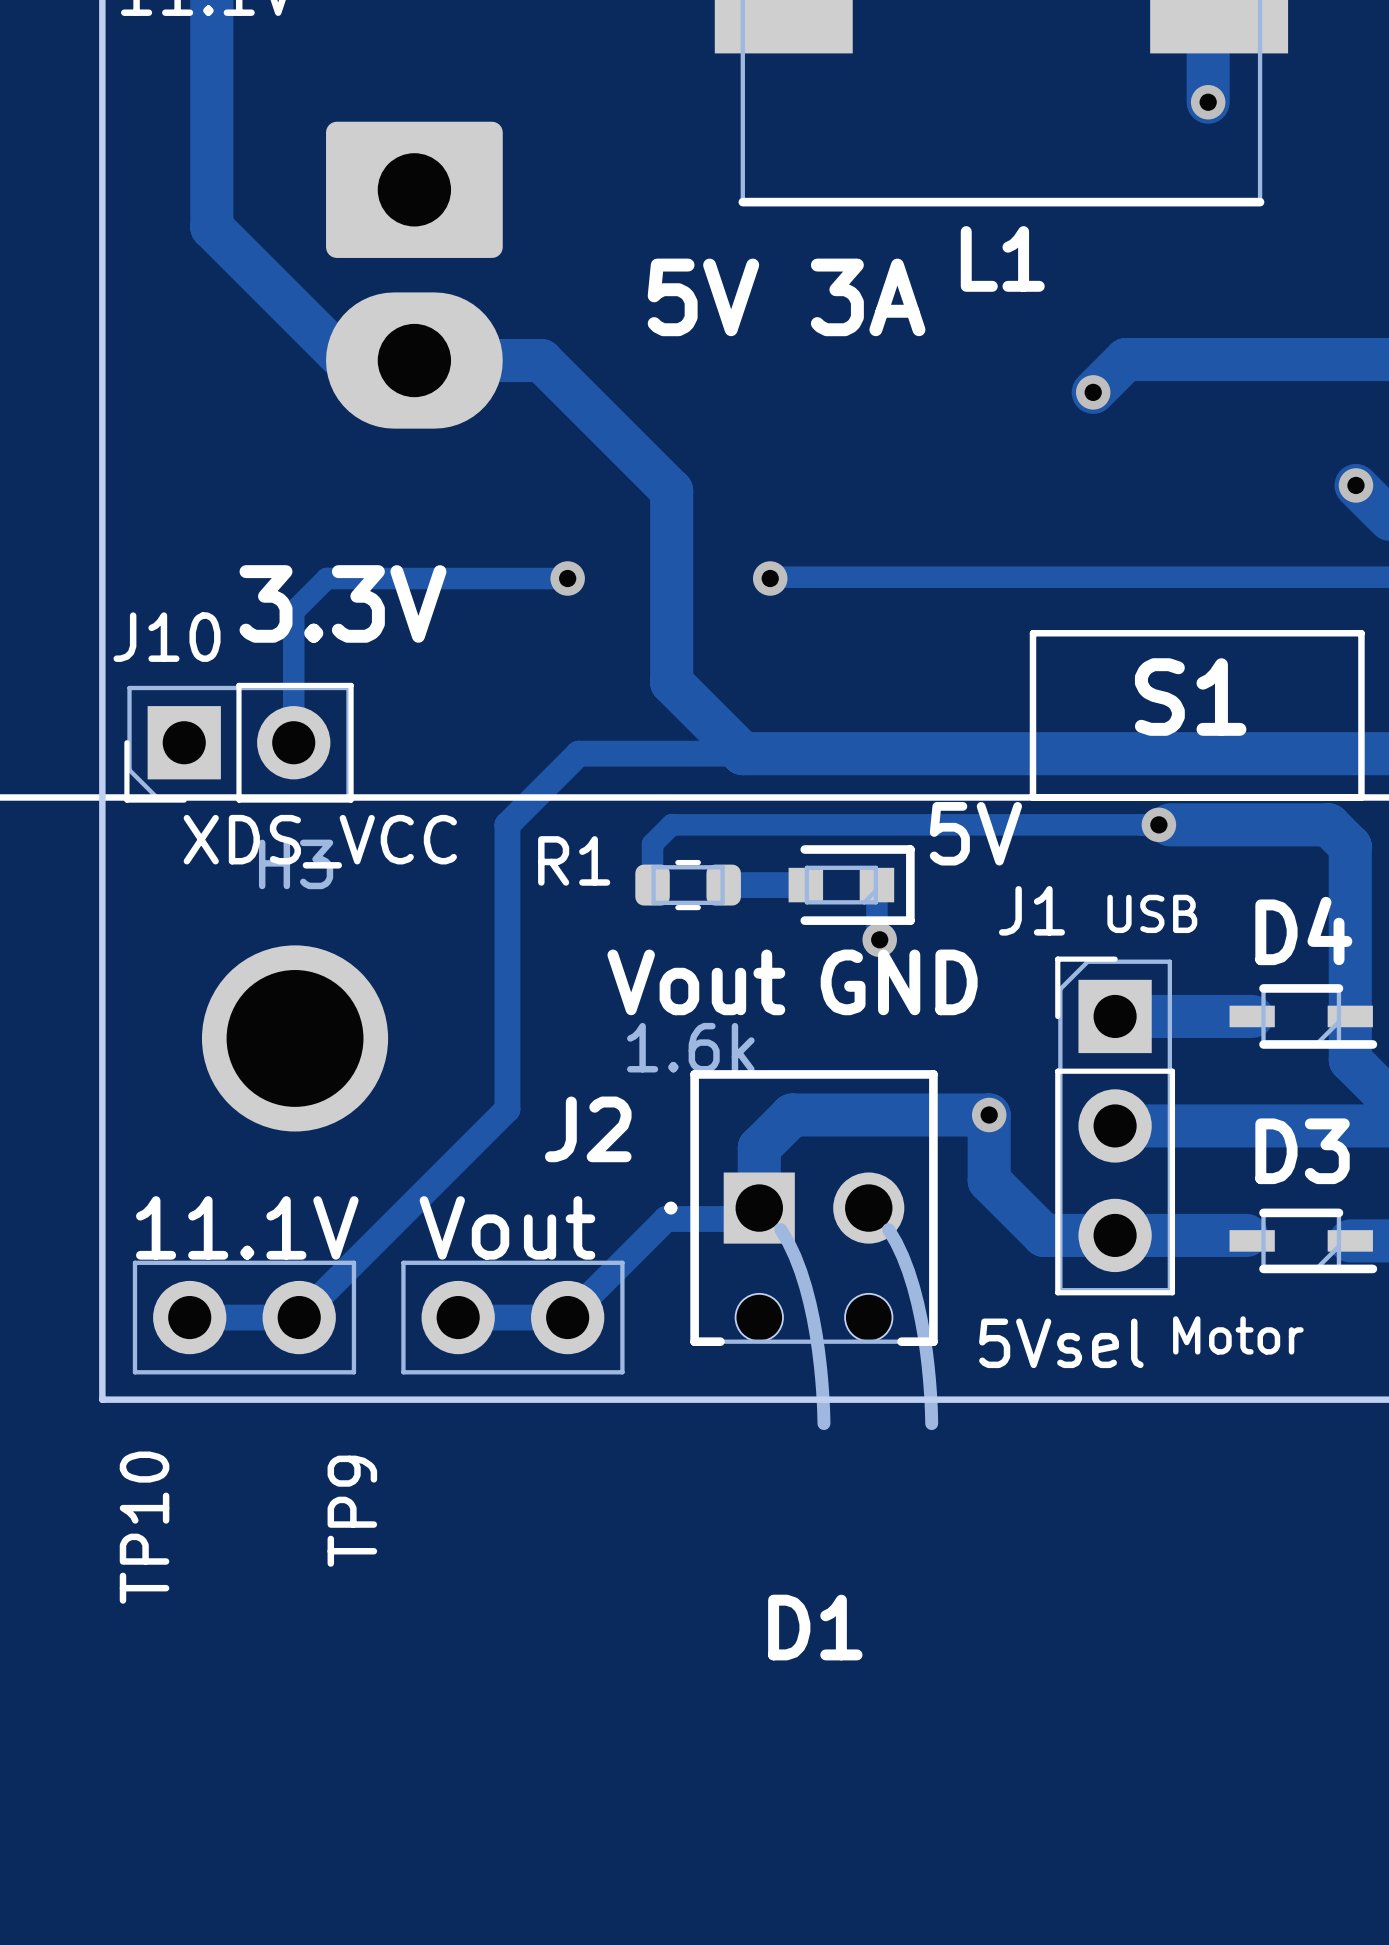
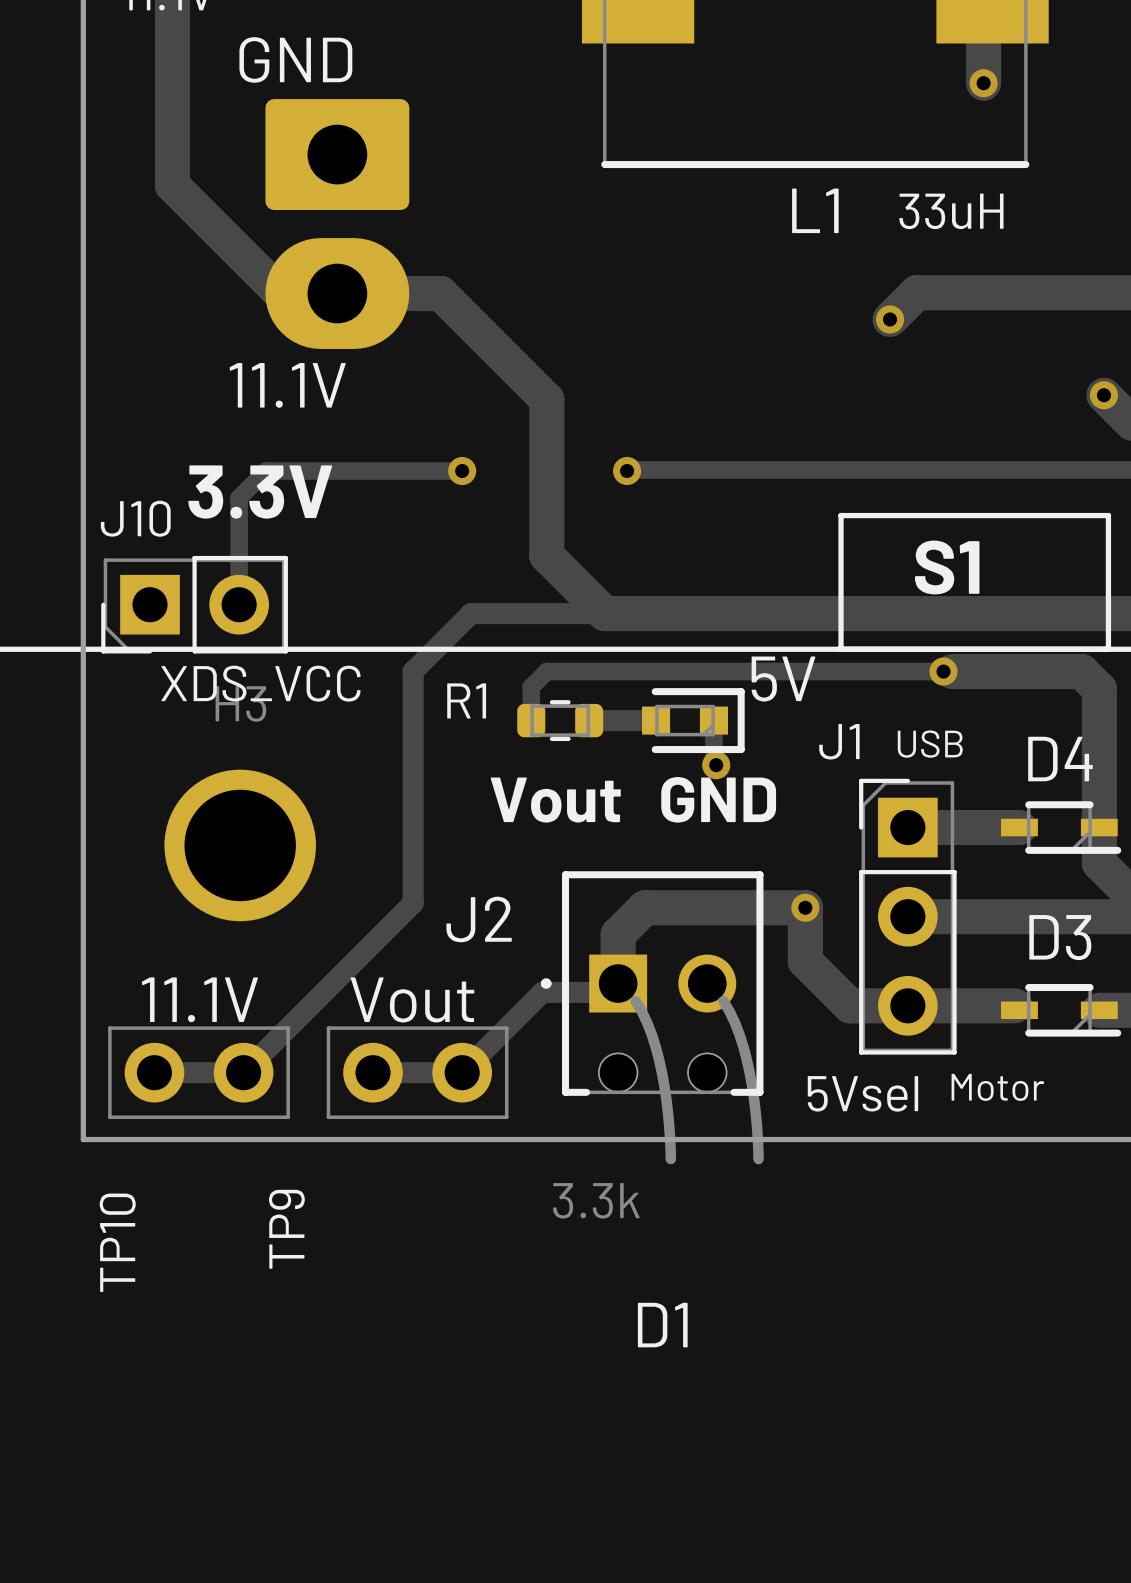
text: none -> GND (295, 59)
text: none -> 33uH (951, 211)
text: 5V 3A (786, 297) -> none
text: none -> 11.1V (287, 385)
R1 value: 1.6k (690, 1047) -> 3.3k (596, 1200)

